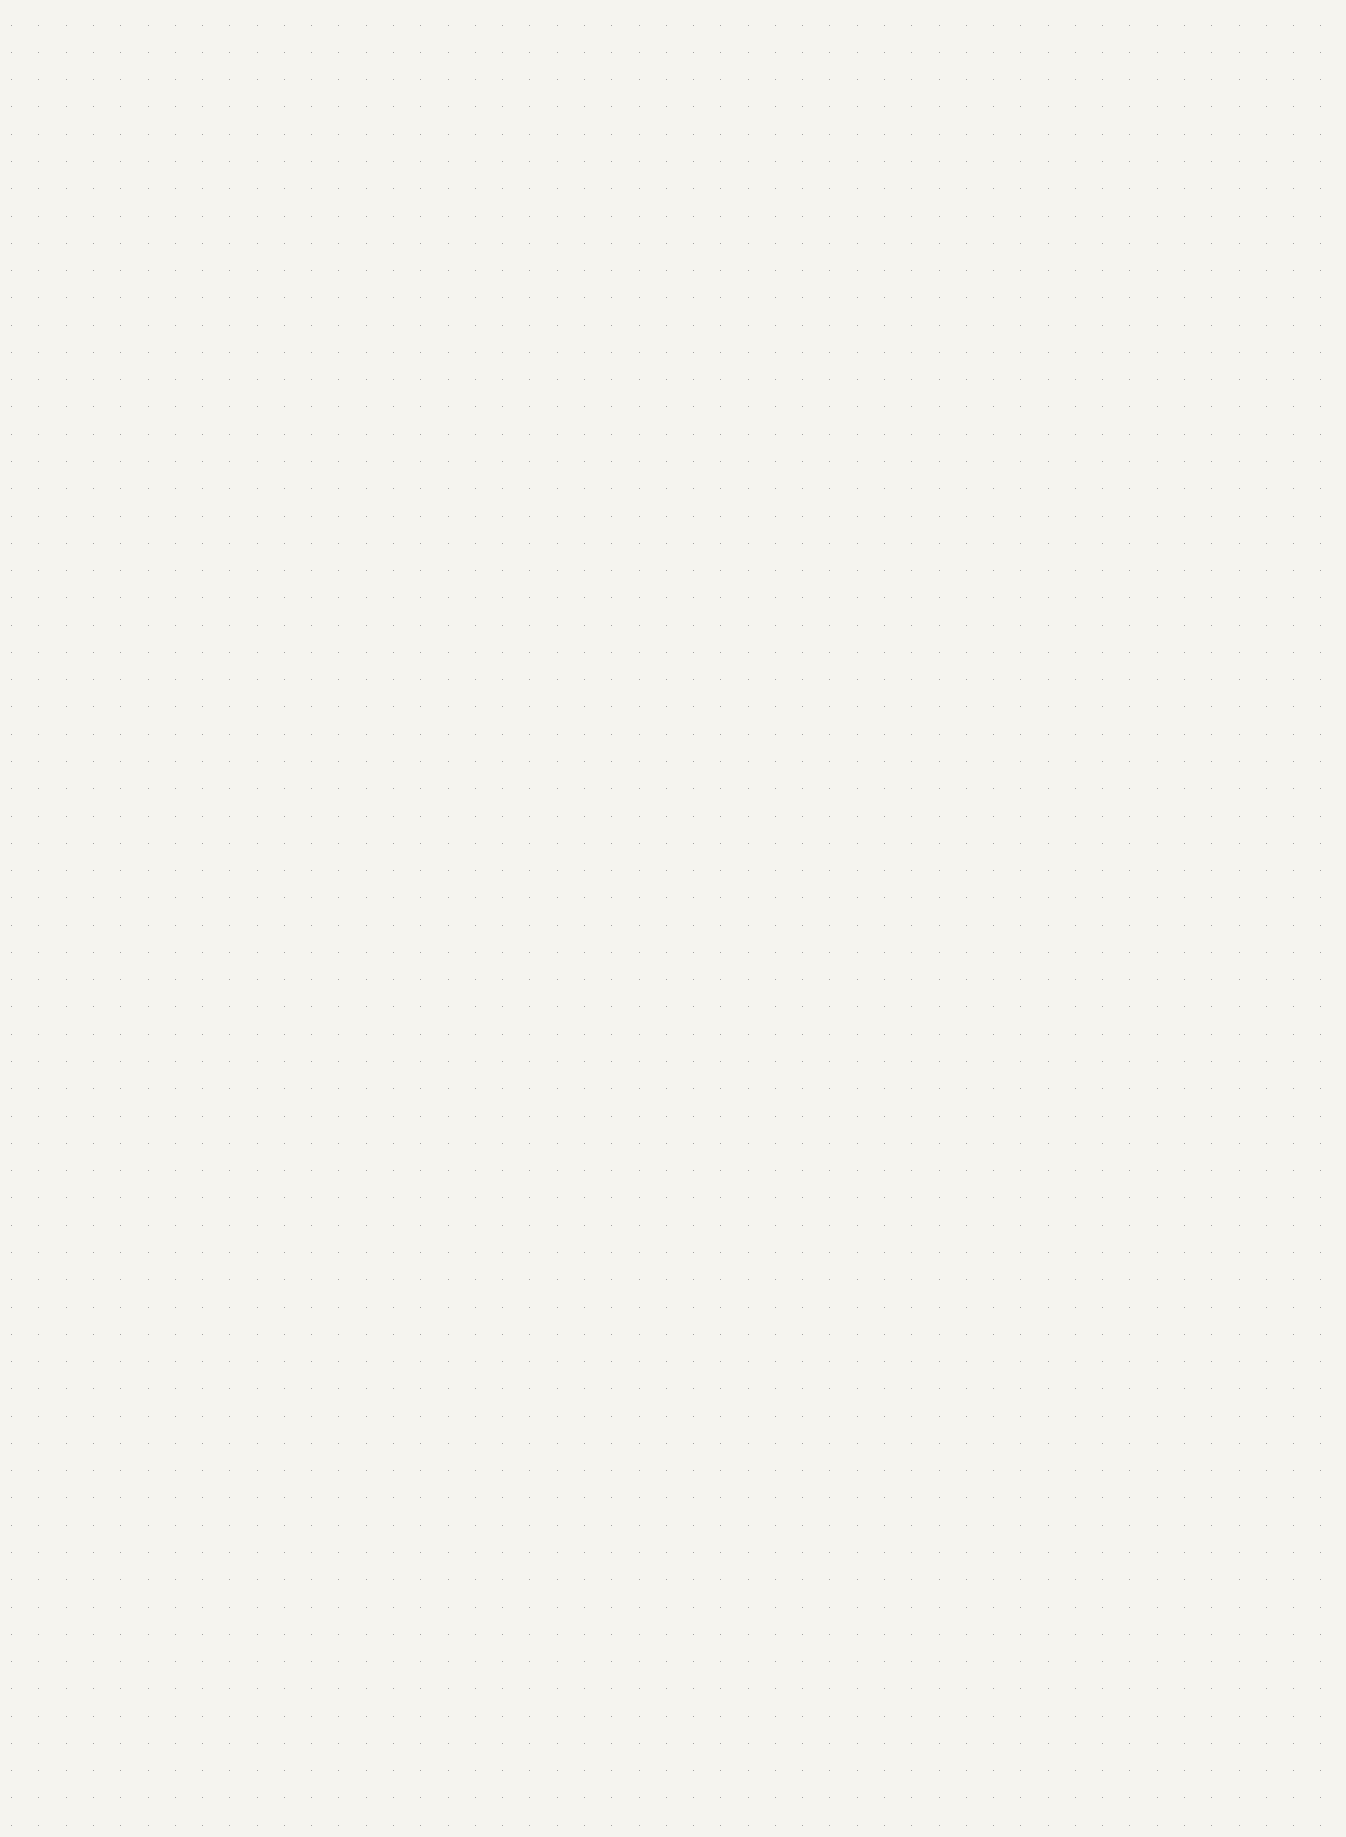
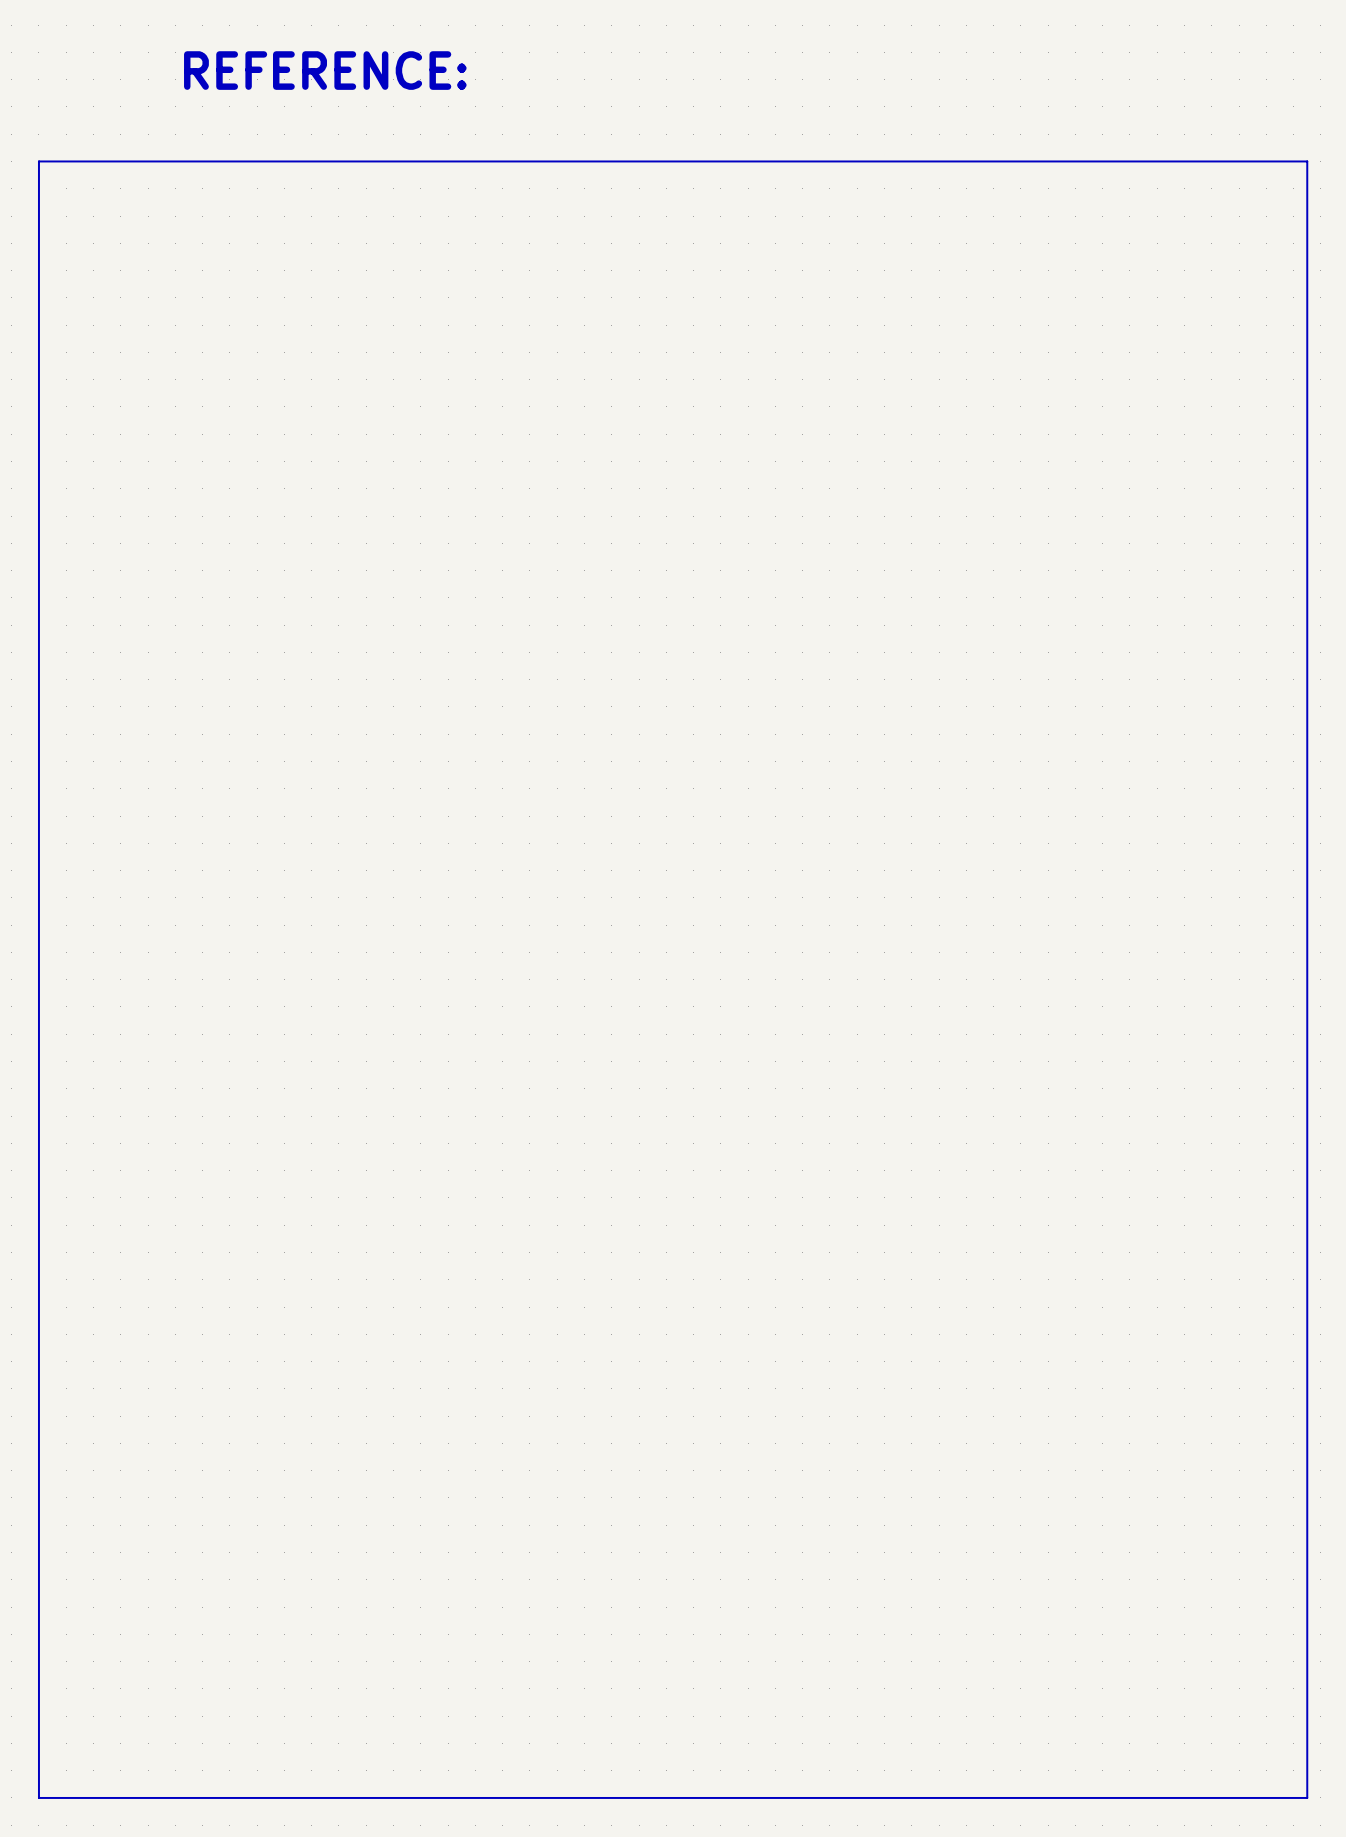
text: none -> REFERENCE: (325, 70)
line: none -> (38, 161) (1307, 161) (1307, 1797) (38, 1797) (38, 161)

